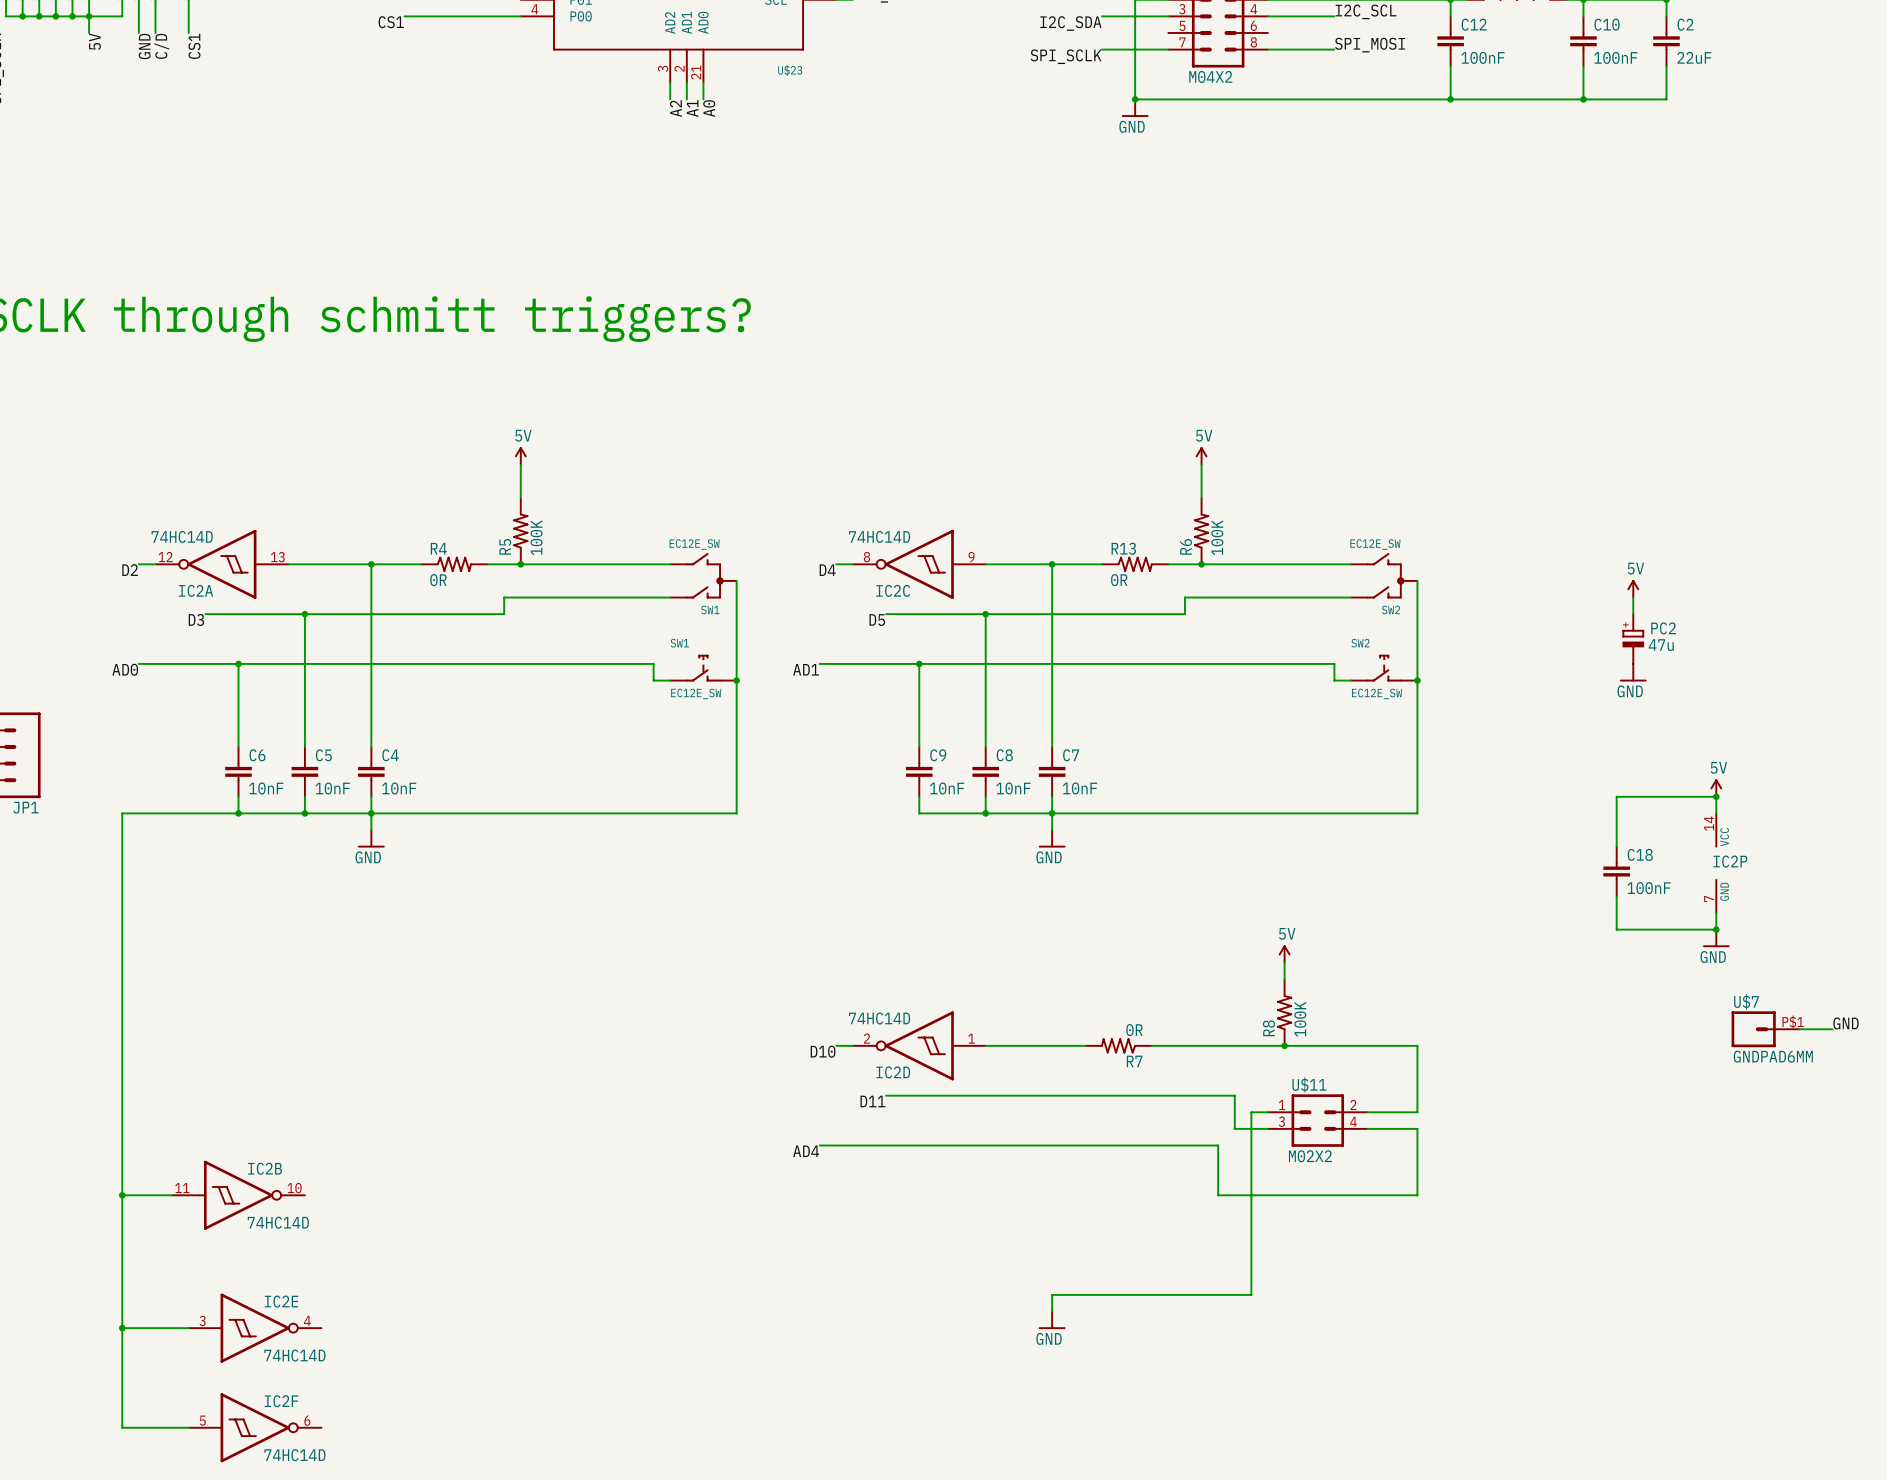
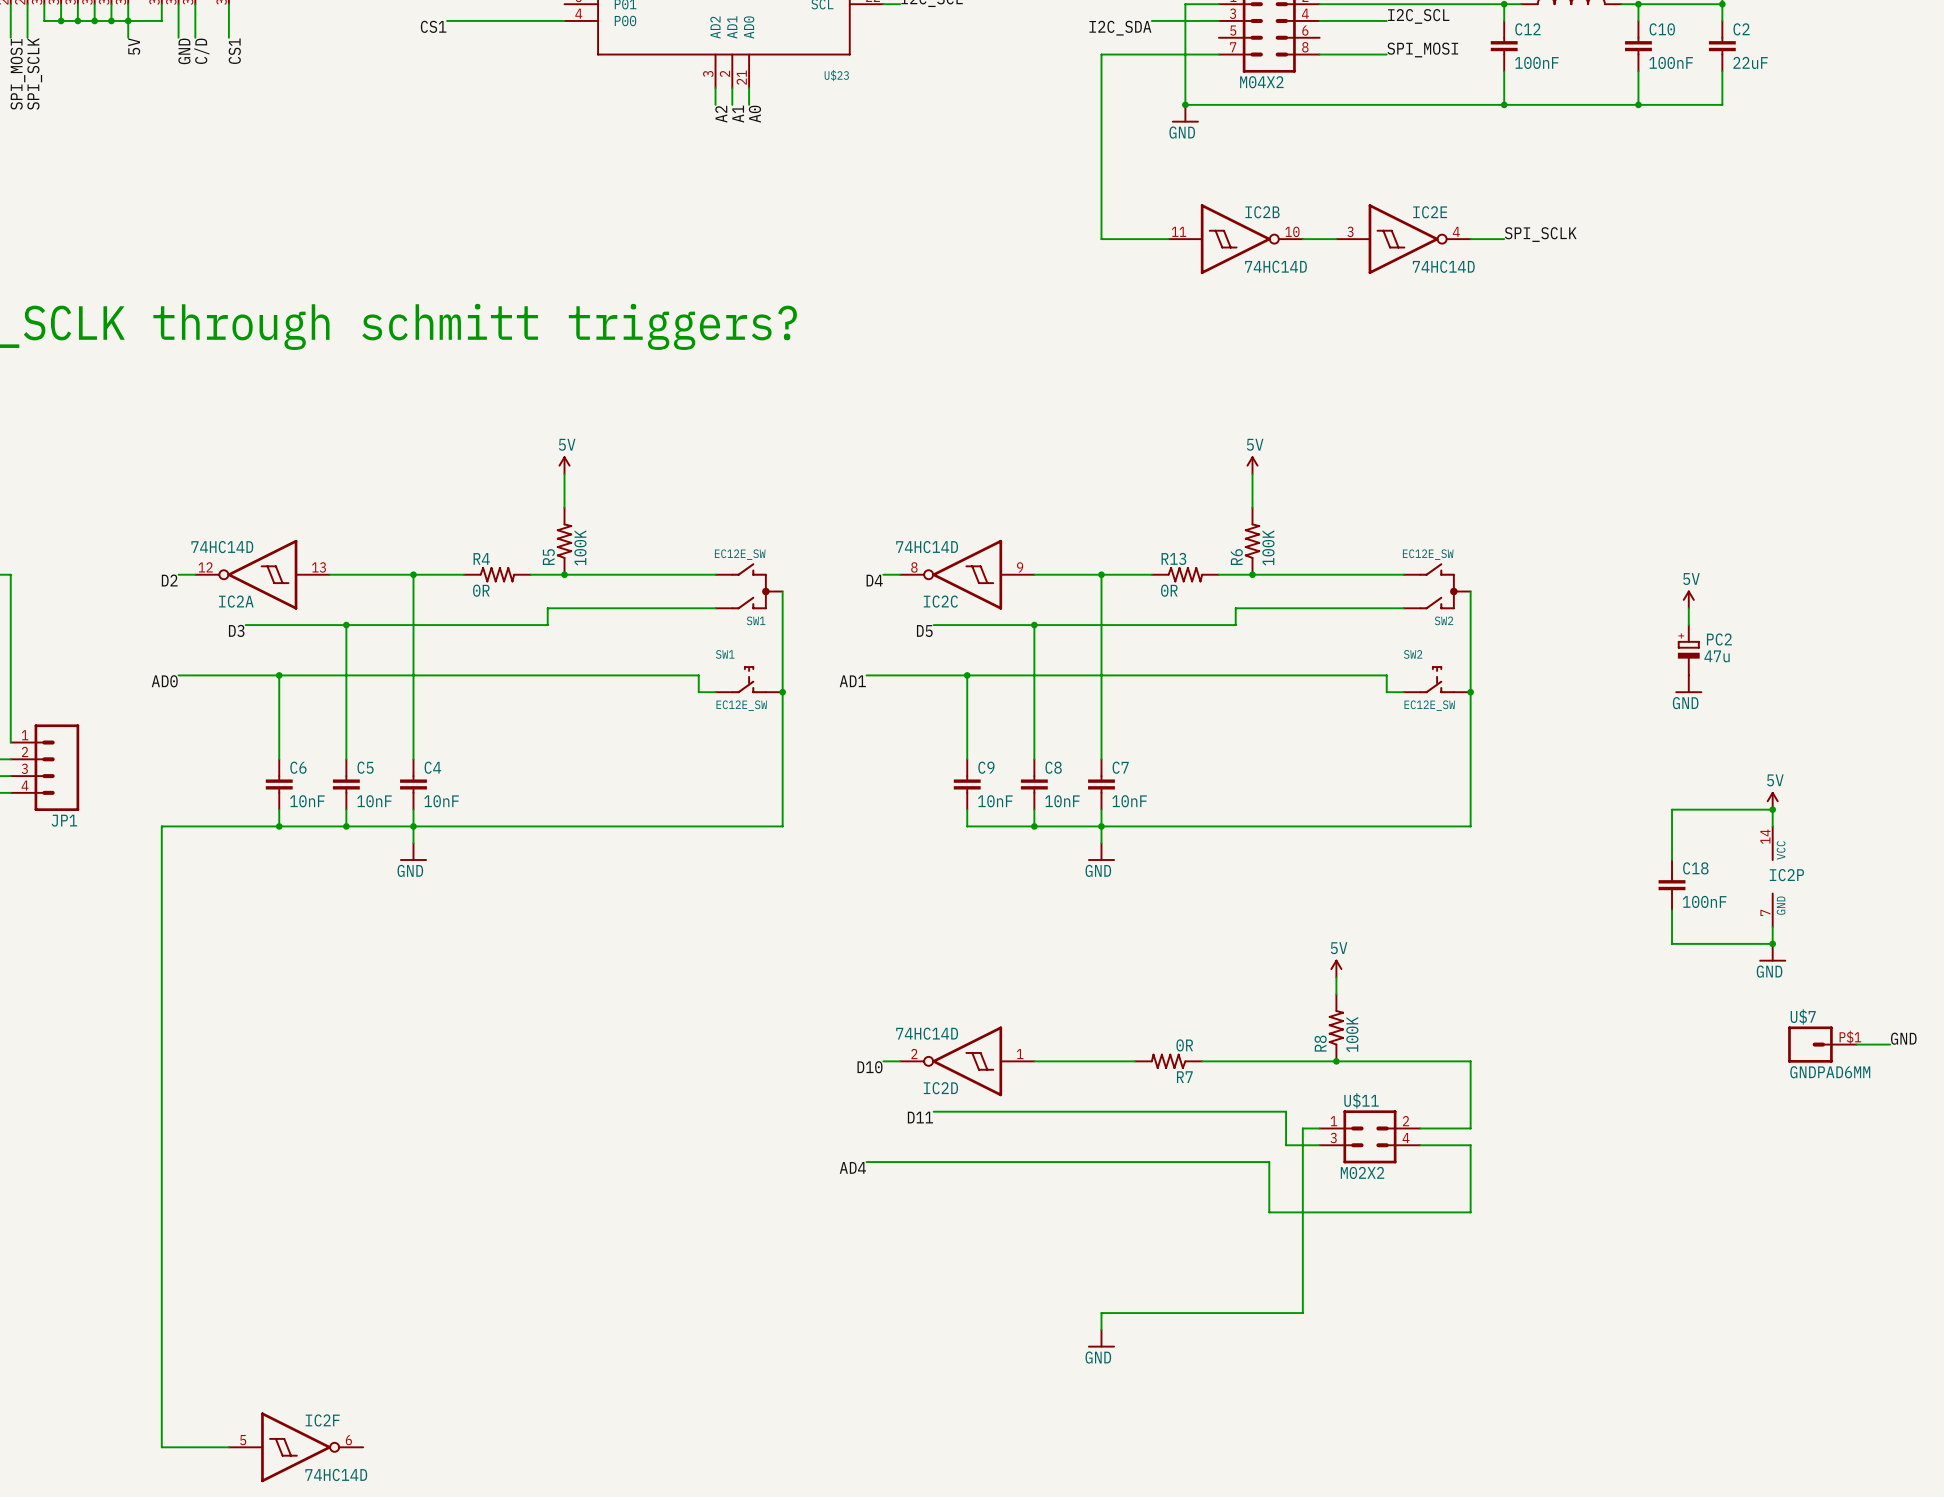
wire: none -> (1151, 54) (1101, 54) (1101, 239) (1168, 239)
label: SPI_SCLK (1066, 56) -> none
label: none -> SPI_SCLK (1540, 234)
wire: none -> (1302, 239) (1336, 239)
wire: none -> (1470, 239) (1504, 239)
wire: (122, 1195) (172, 1195) -> none
junction: (122, 1195) -> none
IC2B position: (238, 1195) -> (1235, 239)
wire: (122, 1328) (188, 1328) -> none
junction: (122, 1328) -> none
IC2E position: (255, 1328) -> (1403, 239)

